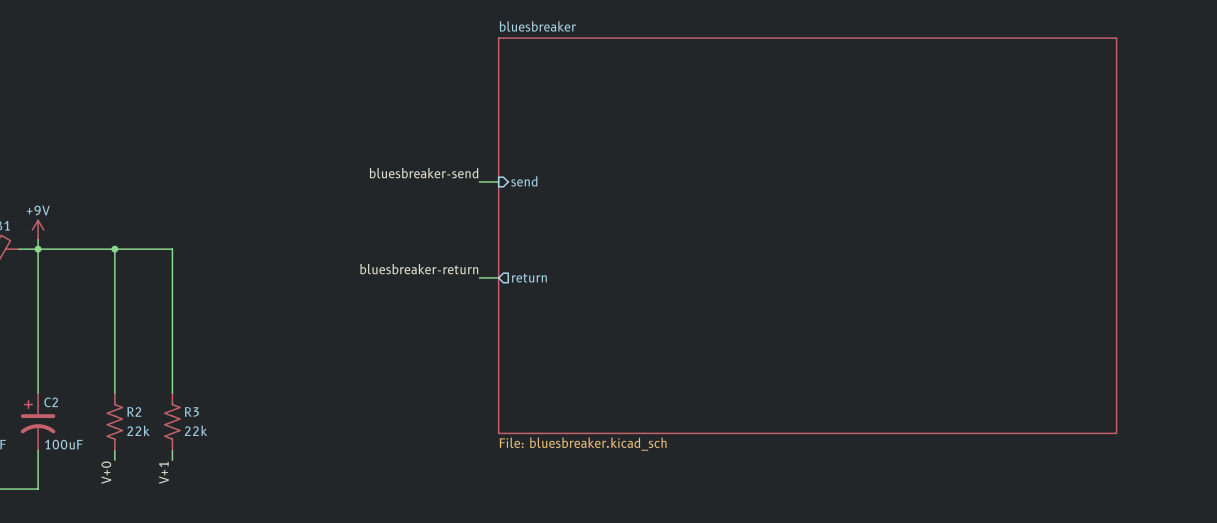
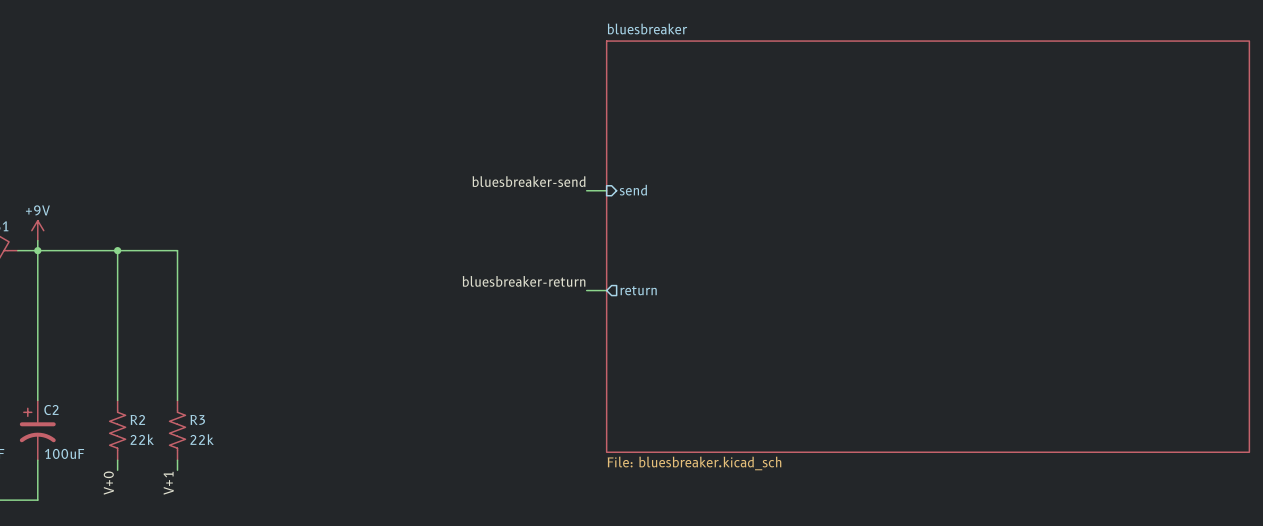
label position: bluesbreaker-send (424, 173) -> bluesbreaker-send (529, 181)
wire: (479, 181) (498, 181) -> (586, 190) (606, 190)
sheet pin position: send (524, 181) -> send (633, 190)
sheet bluesbreaker position: (807, 235) -> (928, 246)
label position: bluesbreaker-return (419, 269) -> bluesbreaker-return (524, 281)
wire: (479, 277) (498, 277) -> (586, 290) (606, 290)
sheet pin position: return (529, 277) -> return (638, 290)

